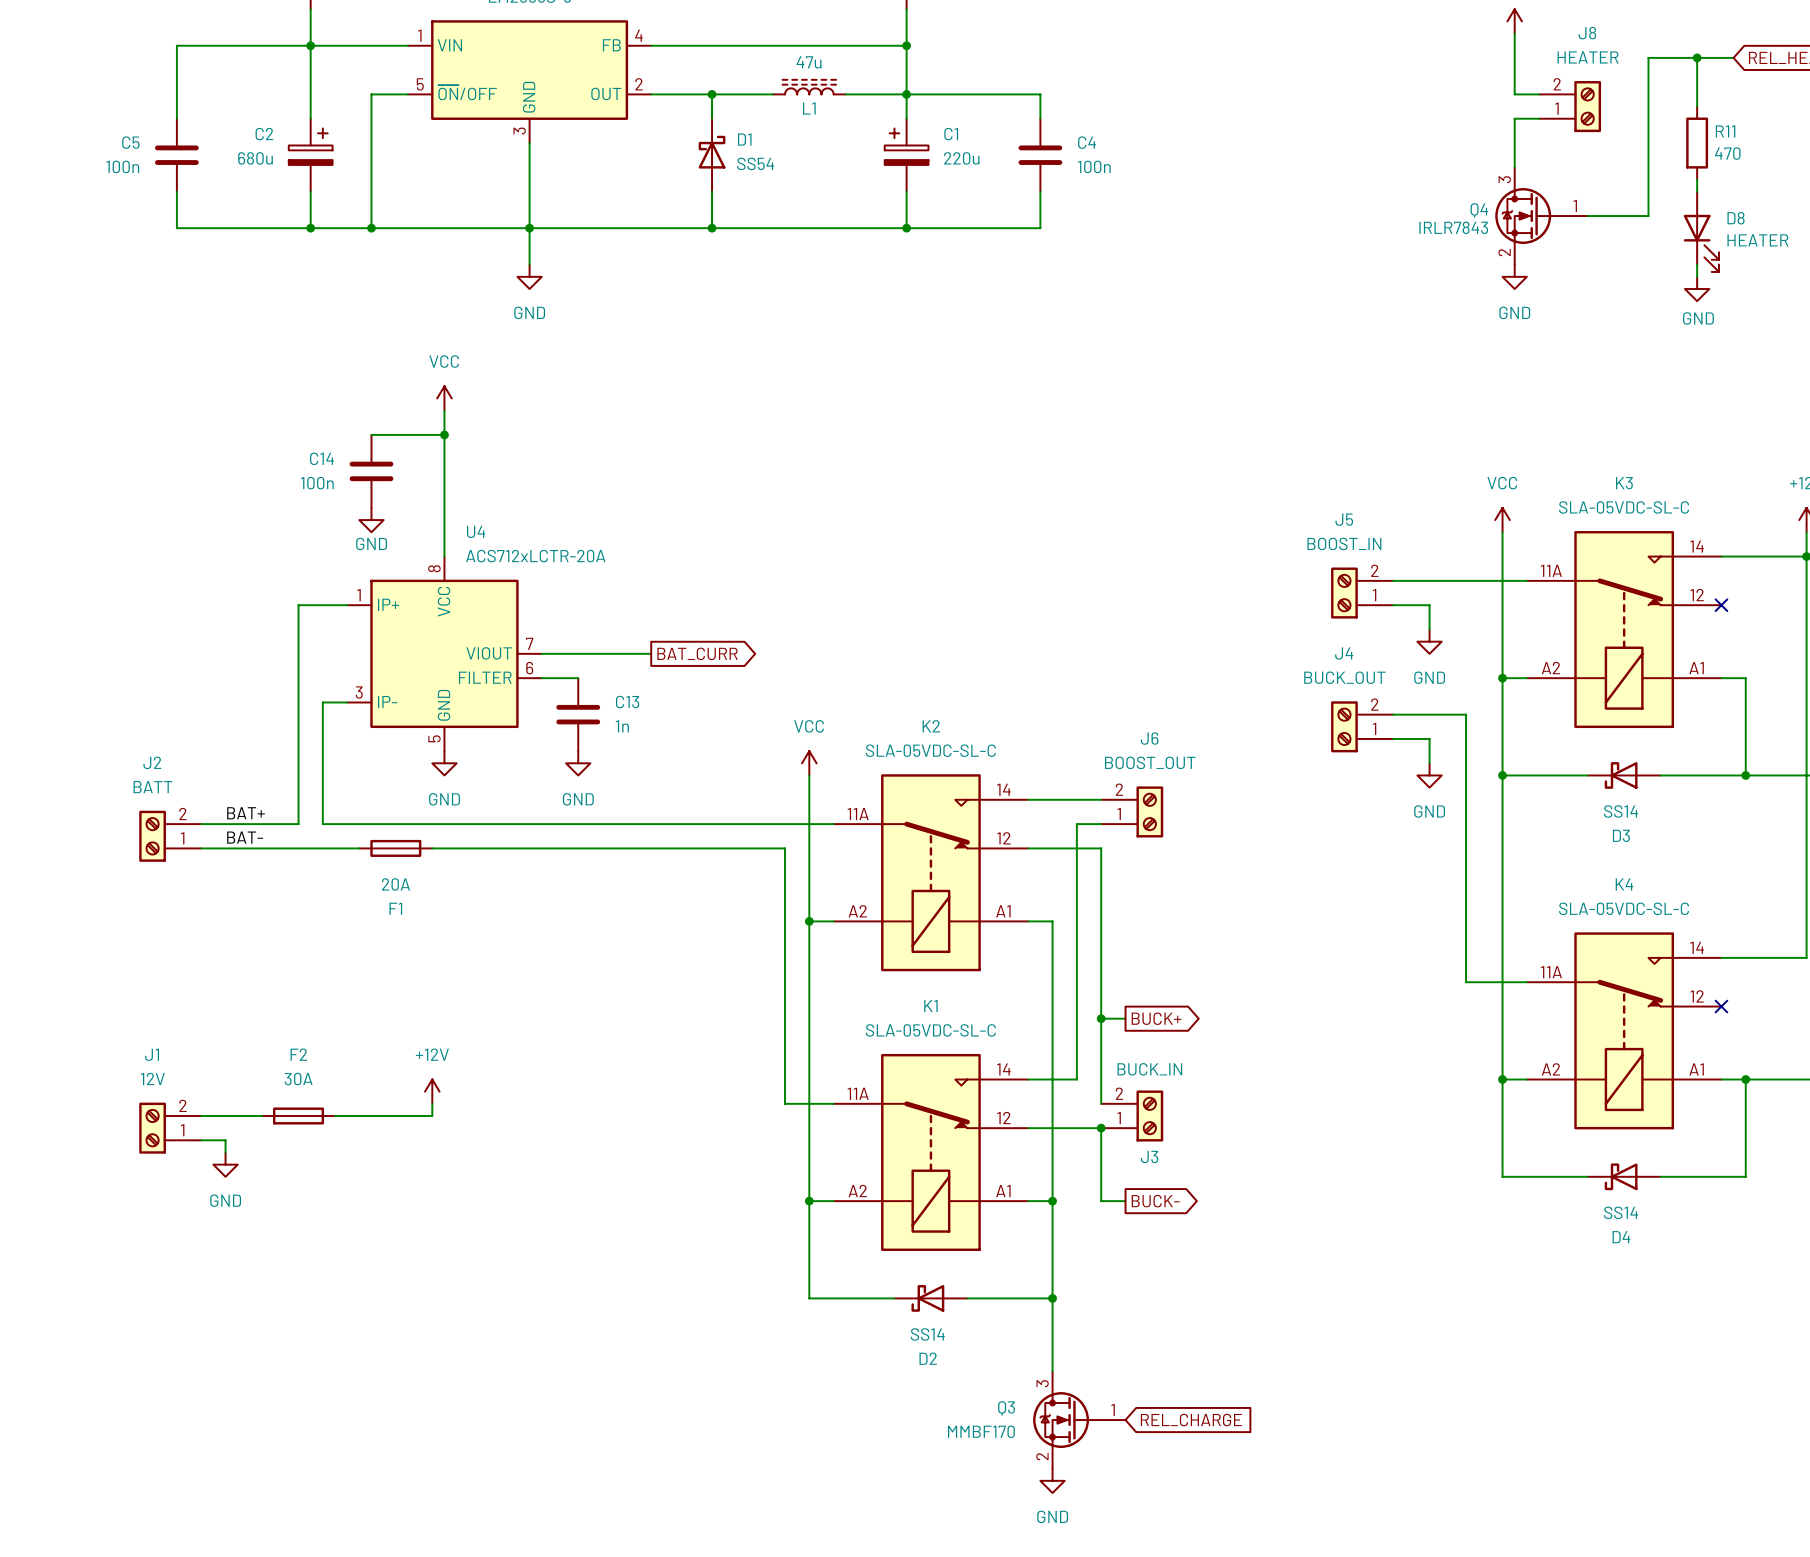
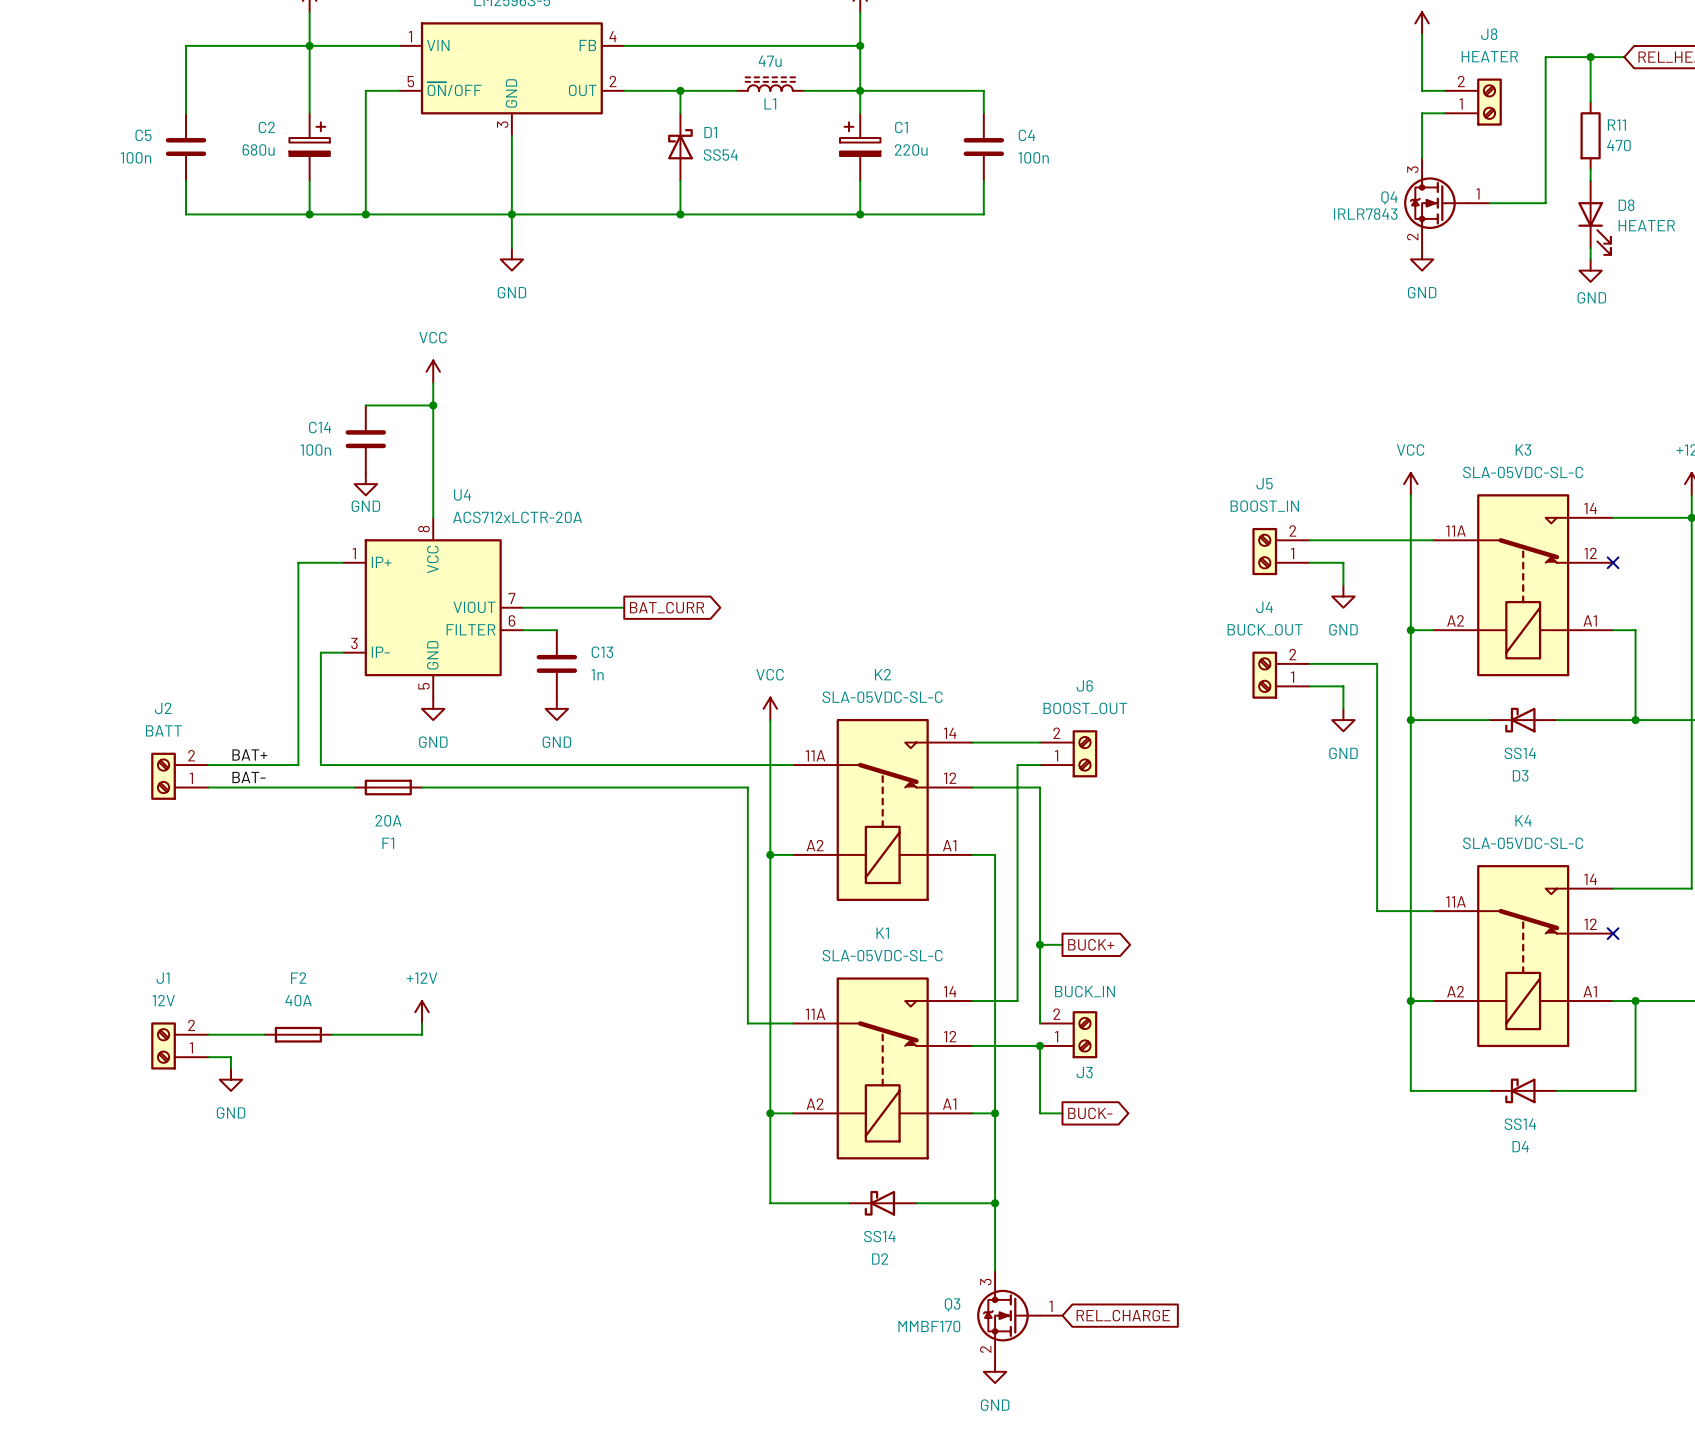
F2 value: 30A (298, 1079) -> 40A (298, 1000)

